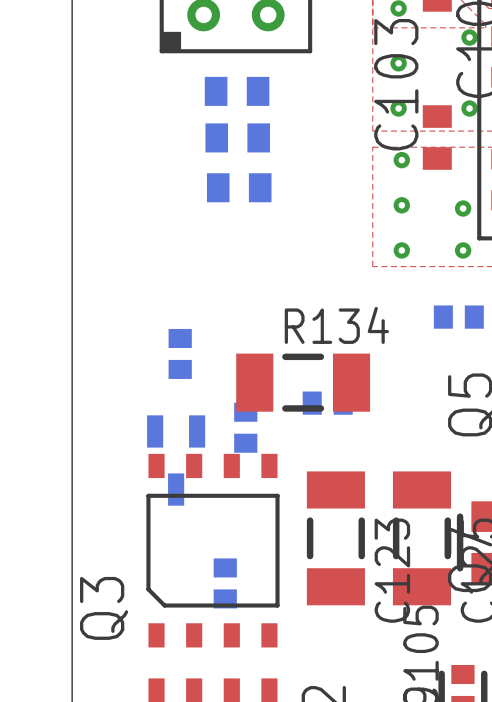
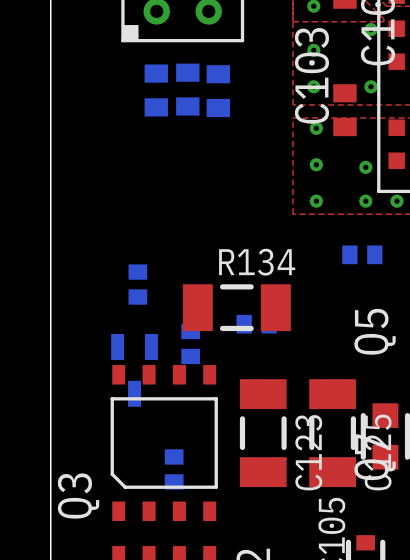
part: (237, 91) -> none
part: none -> (187, 89)
part: none -> (156, 90)
part: none -> (218, 91)
part: (237, 137) -> none
part: (239, 187) -> none

